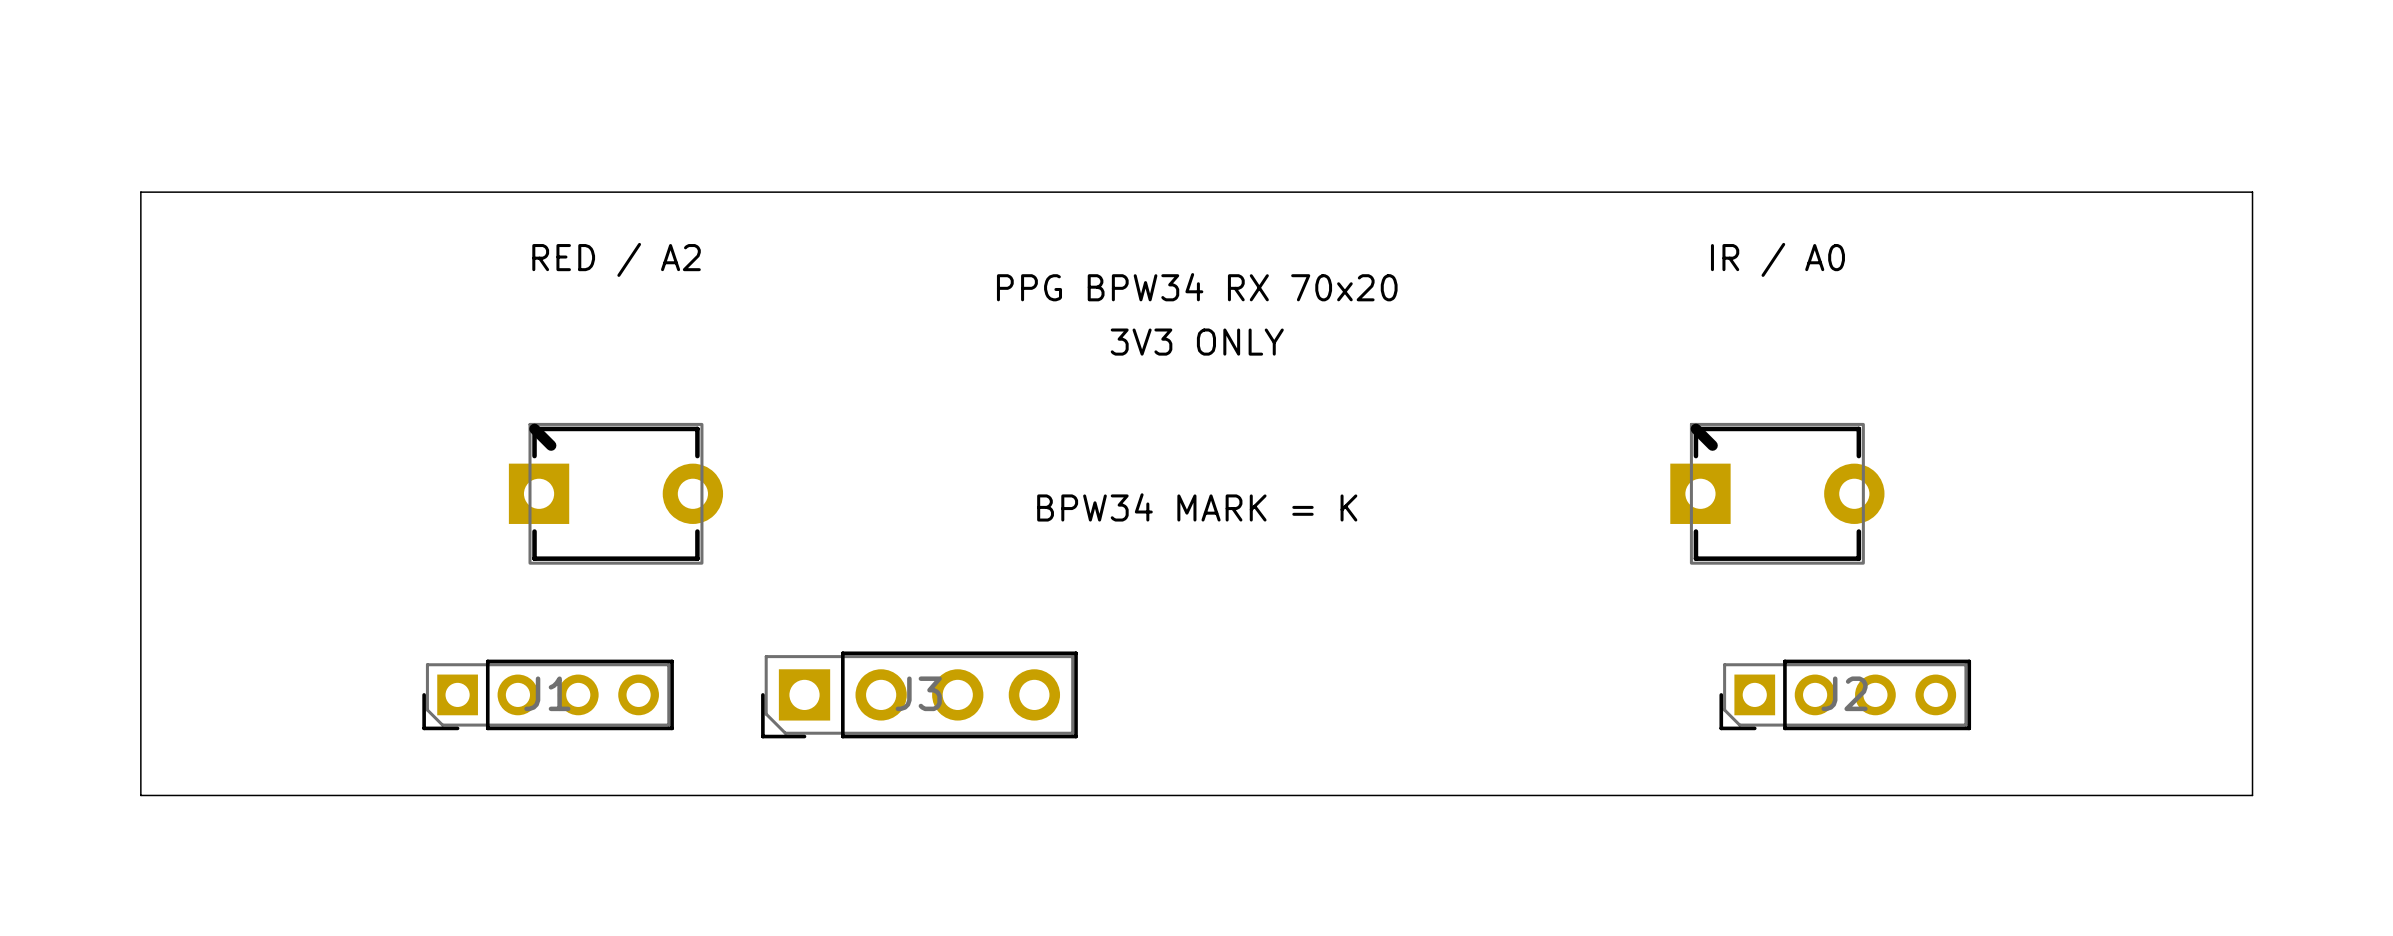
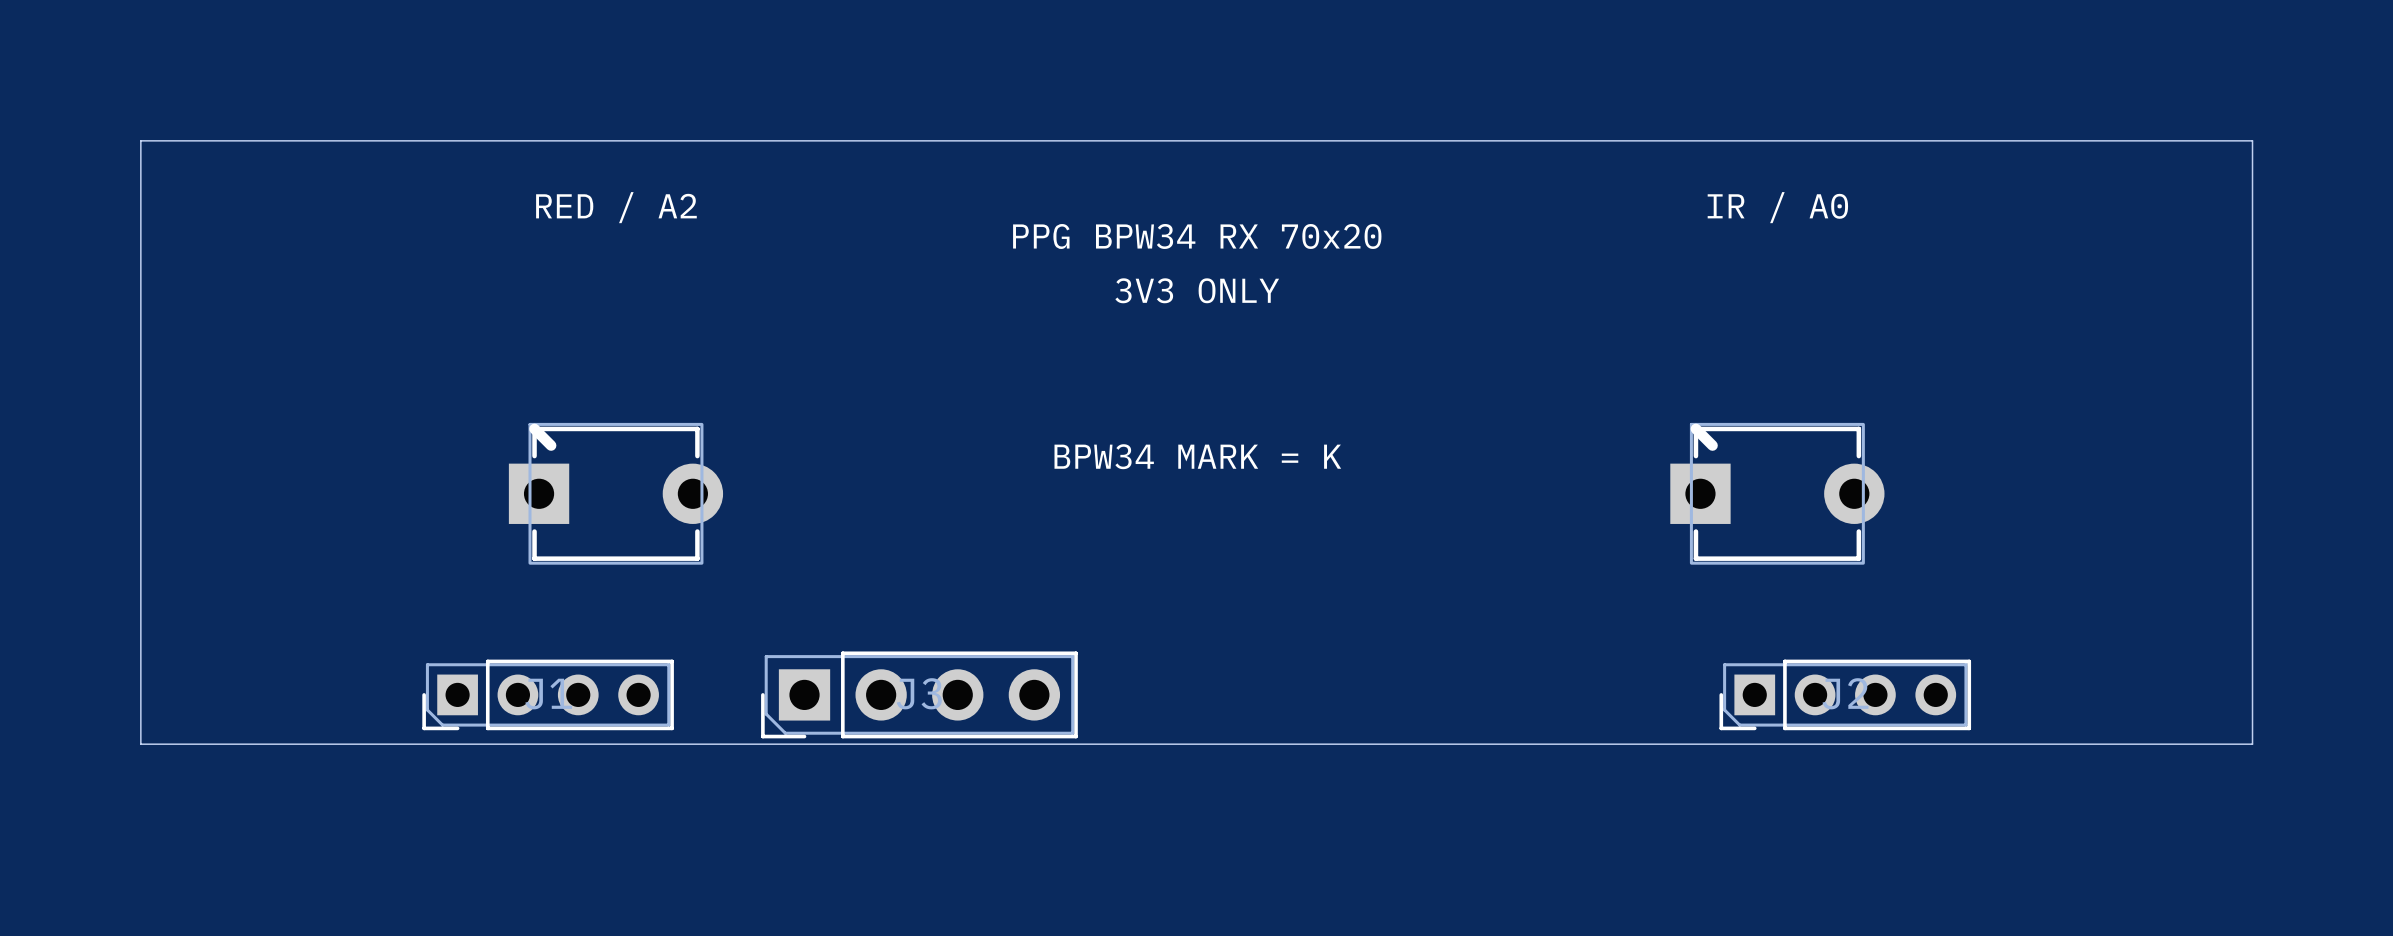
board edge: (140, 192) (2252, 192) -> (140, 192) (140, 140) (2252, 140) (2252, 192)
text: none -> PPG BPW34 RX 70x20 (1197, 236)
text position: RED / A2 (616, 259) -> RED / A2 (616, 207)
text position: IR / A0 (1777, 259) -> IR / A0 (1777, 207)
text: PPG BPW34 RX 70x20 (1197, 287) -> 3V3 ONLY (1197, 290)
text: 3V3 ONLY (1197, 342) -> none
text position: BPW34 MARK = K (1197, 507) -> BPW34 MARK = K (1197, 456)
board edge: (140, 744) (140, 795) (2252, 795) (2252, 744) -> (140, 744) (2252, 744)

